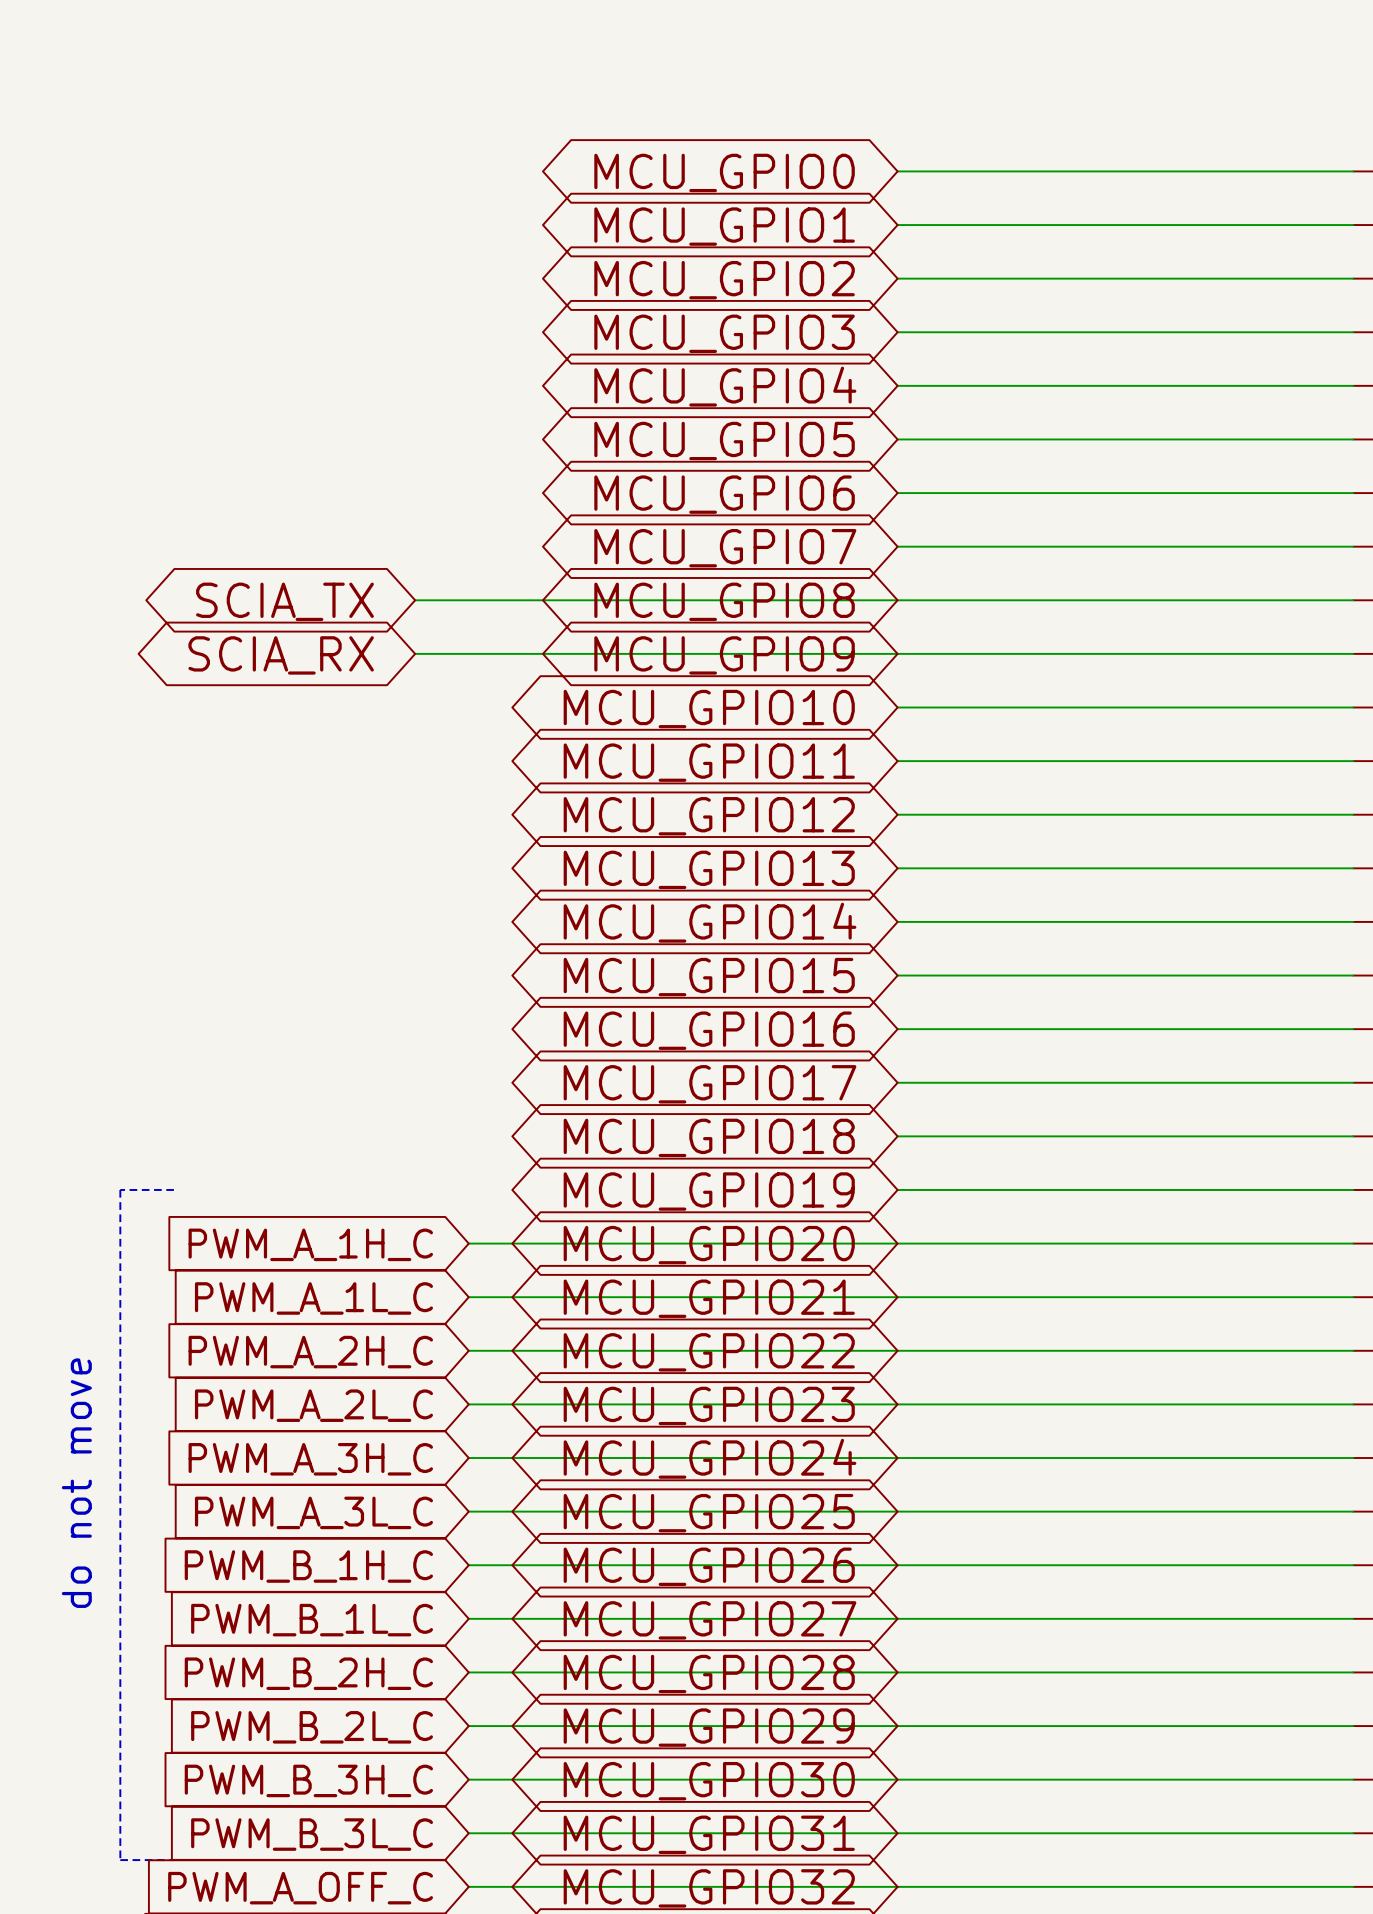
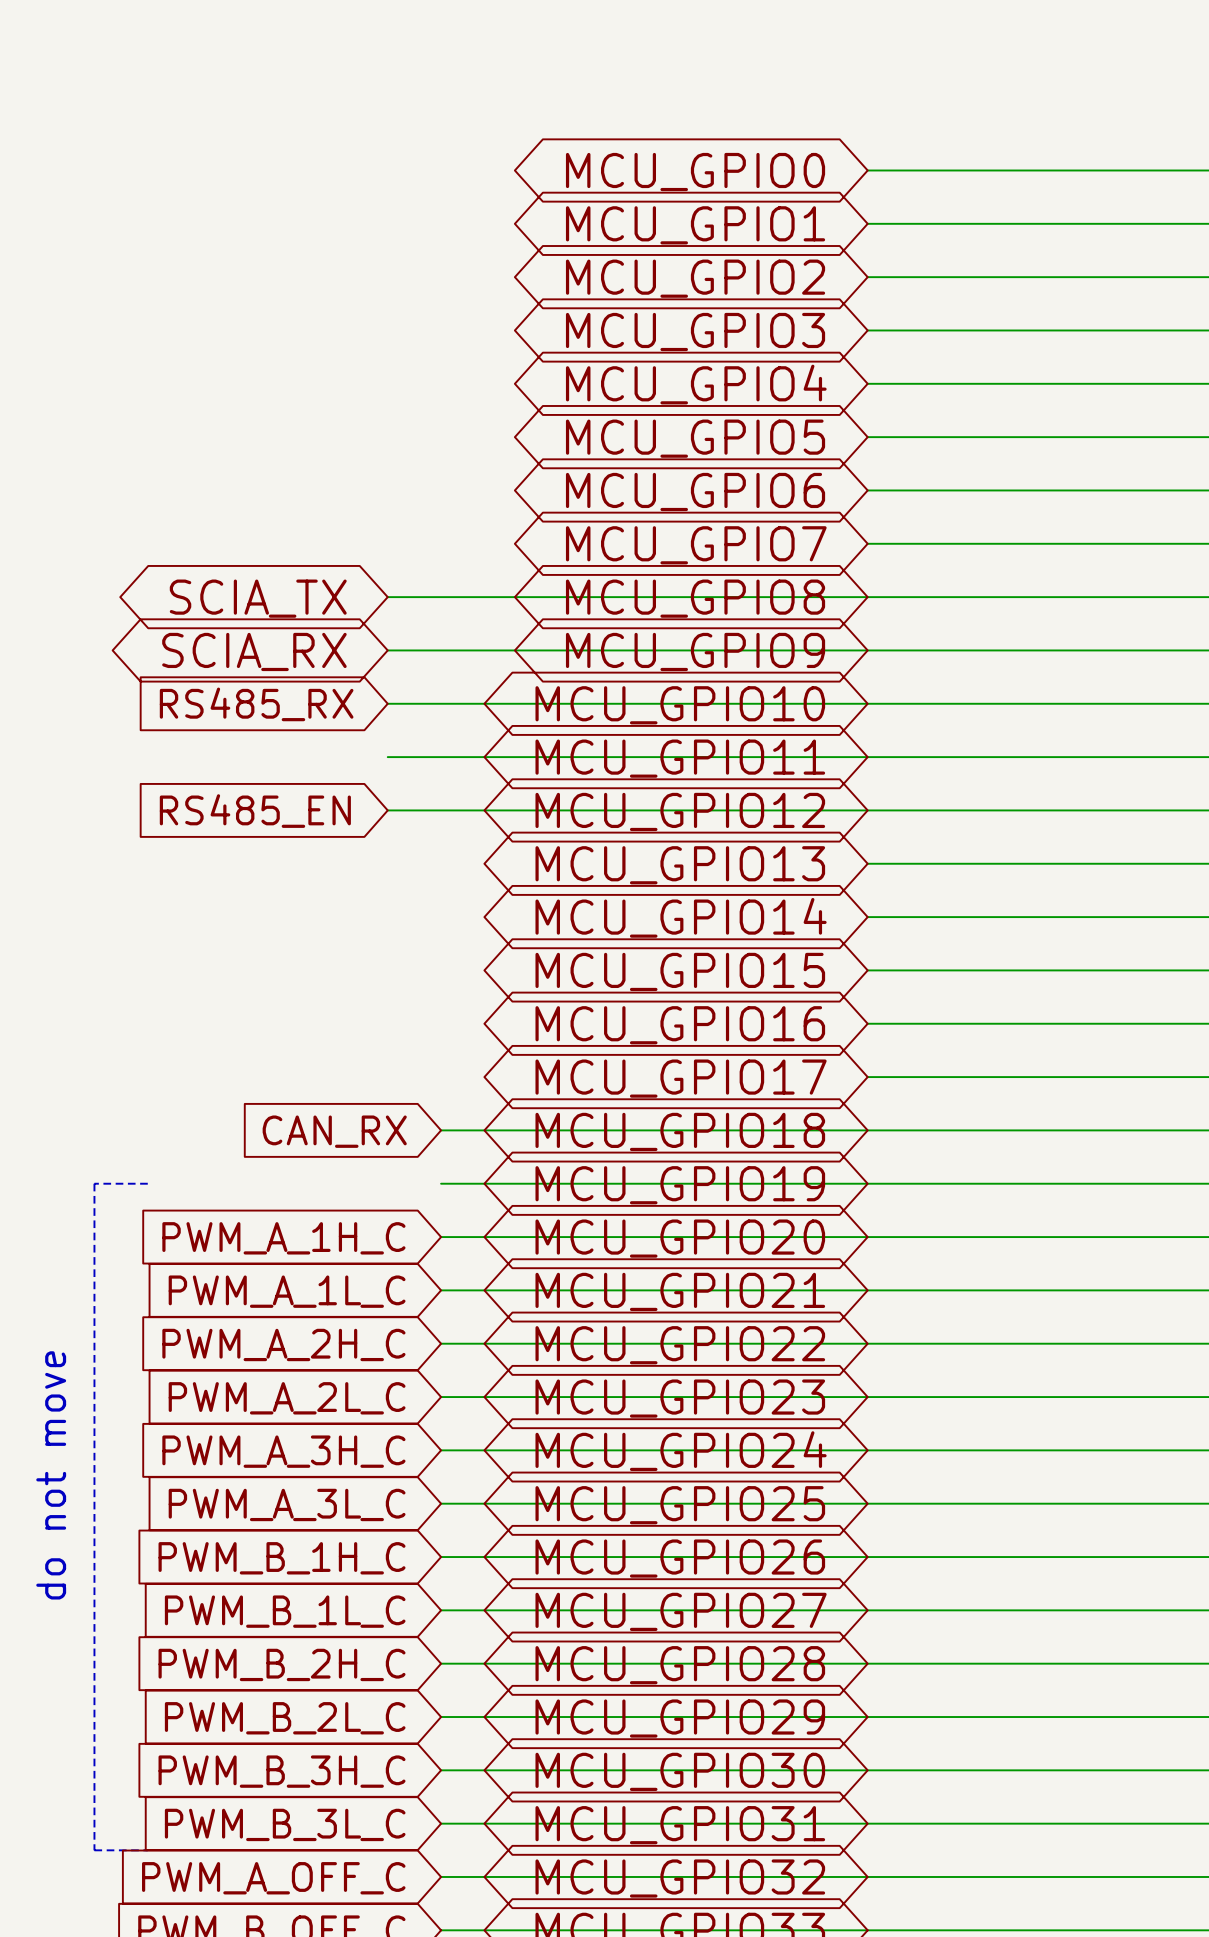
wire: none -> (387, 703) (867, 703)
global label: none -> RS485_RX (256, 704)
wire: none -> (387, 757) (867, 757)
wire: none -> (387, 810) (867, 810)
global label: none -> RS485_EN (255, 811)
wire: none -> (441, 1130) (867, 1130)
global label: none -> CAN_RX (334, 1131)
wire: none -> (441, 1183) (867, 1183)

